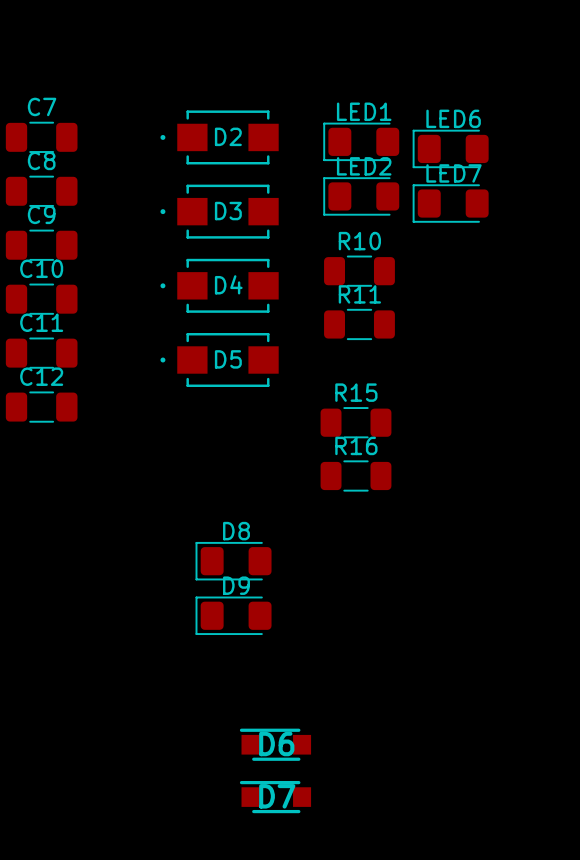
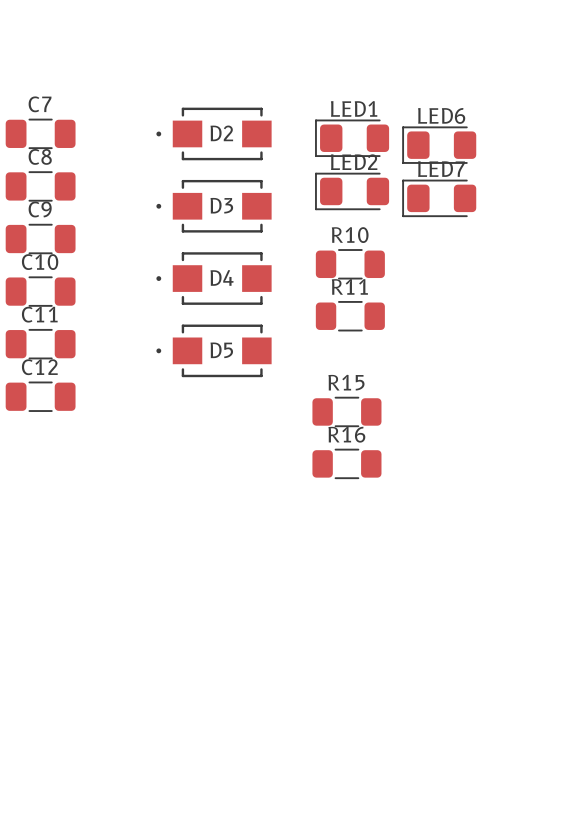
D8: (233, 561) -> none
D9: (233, 615) -> none
D6: (275, 744) -> none
D7: (275, 797) -> none

